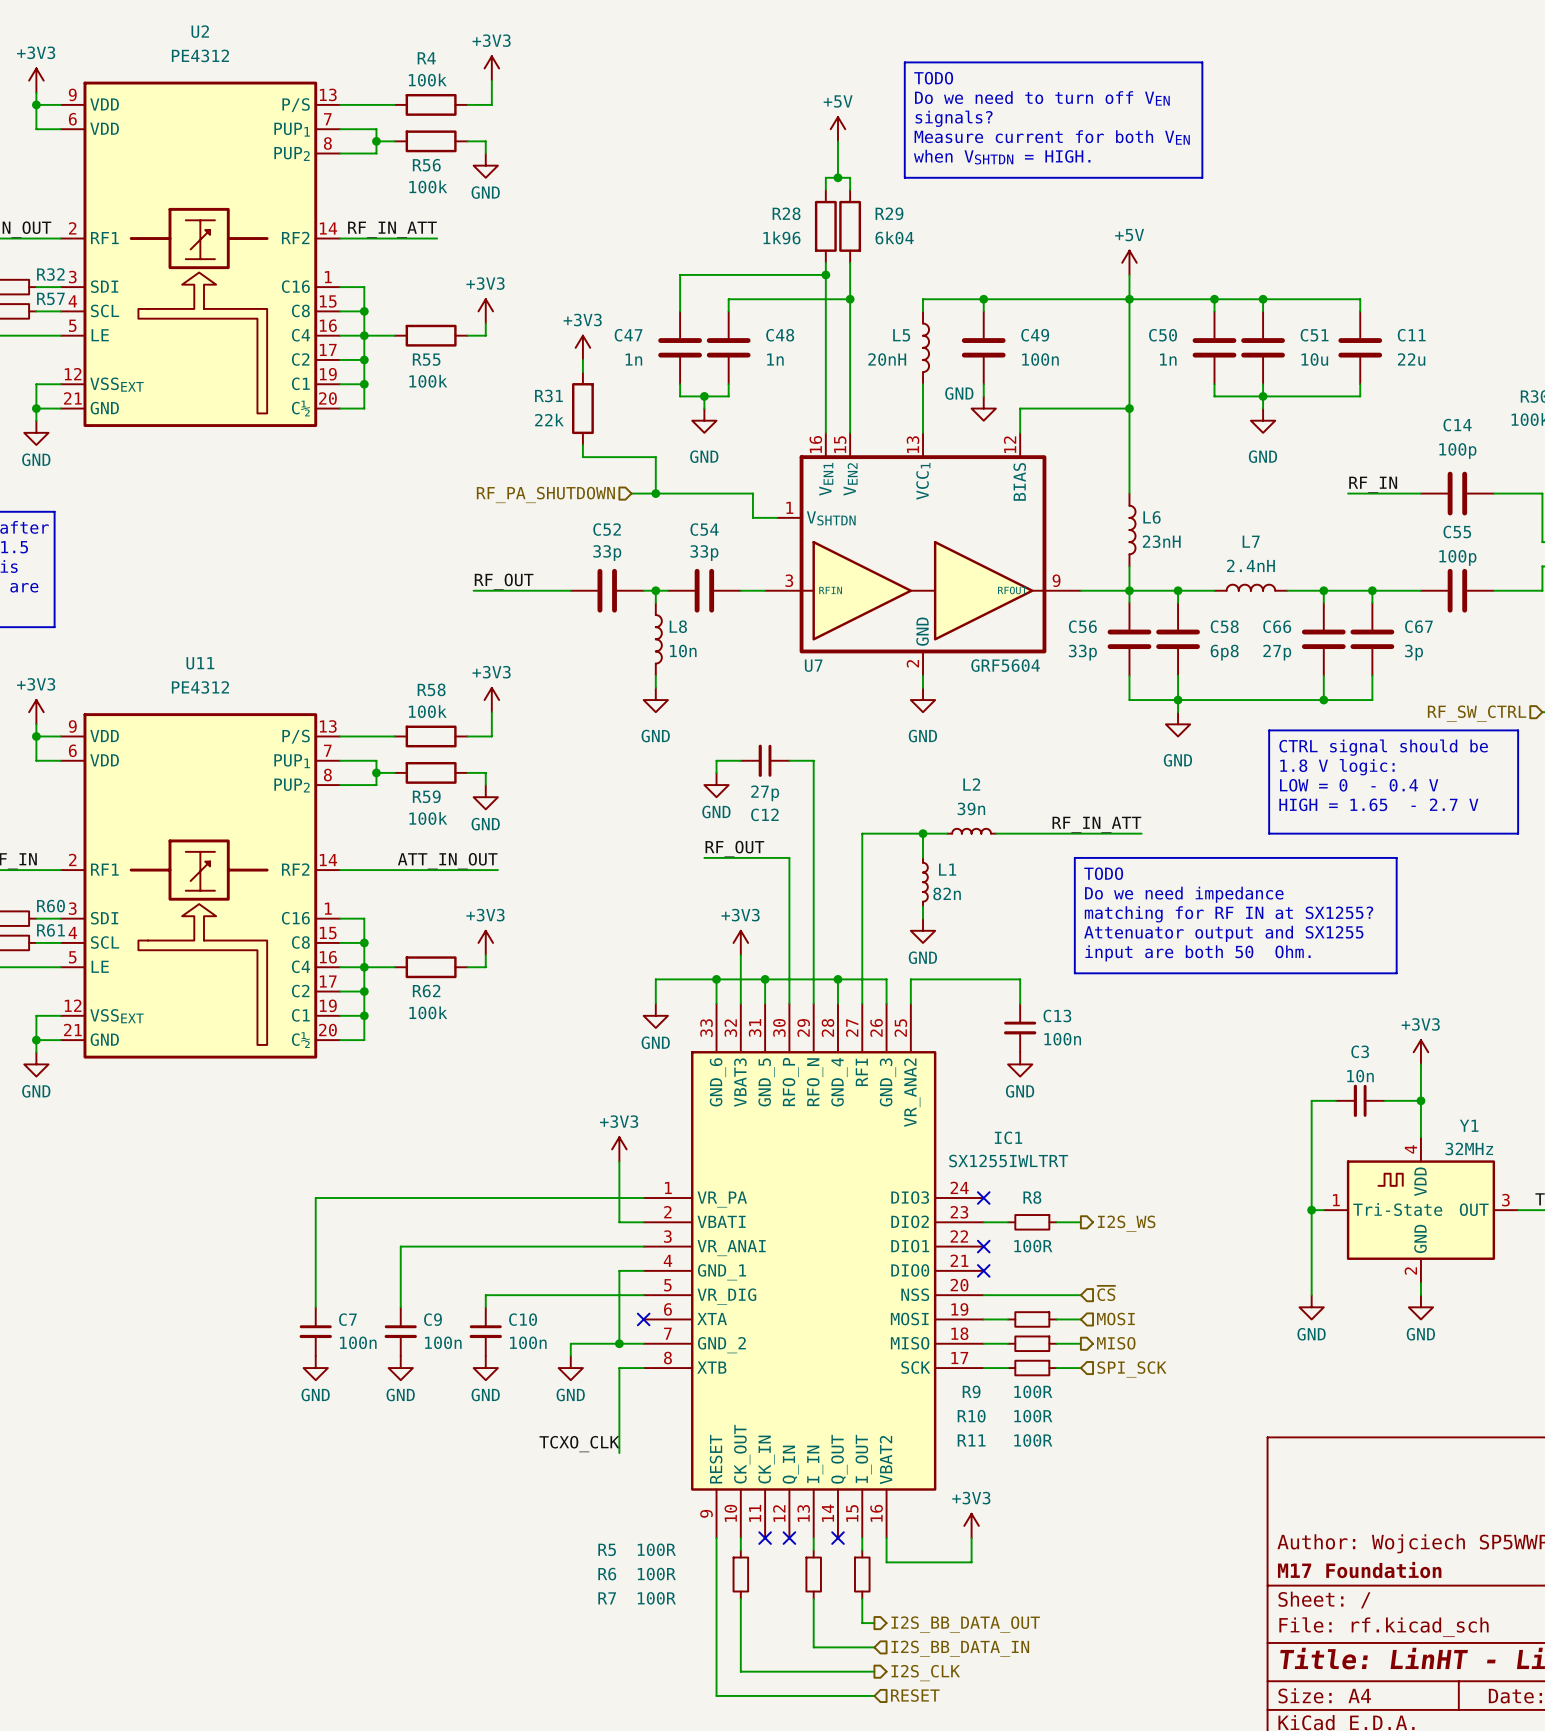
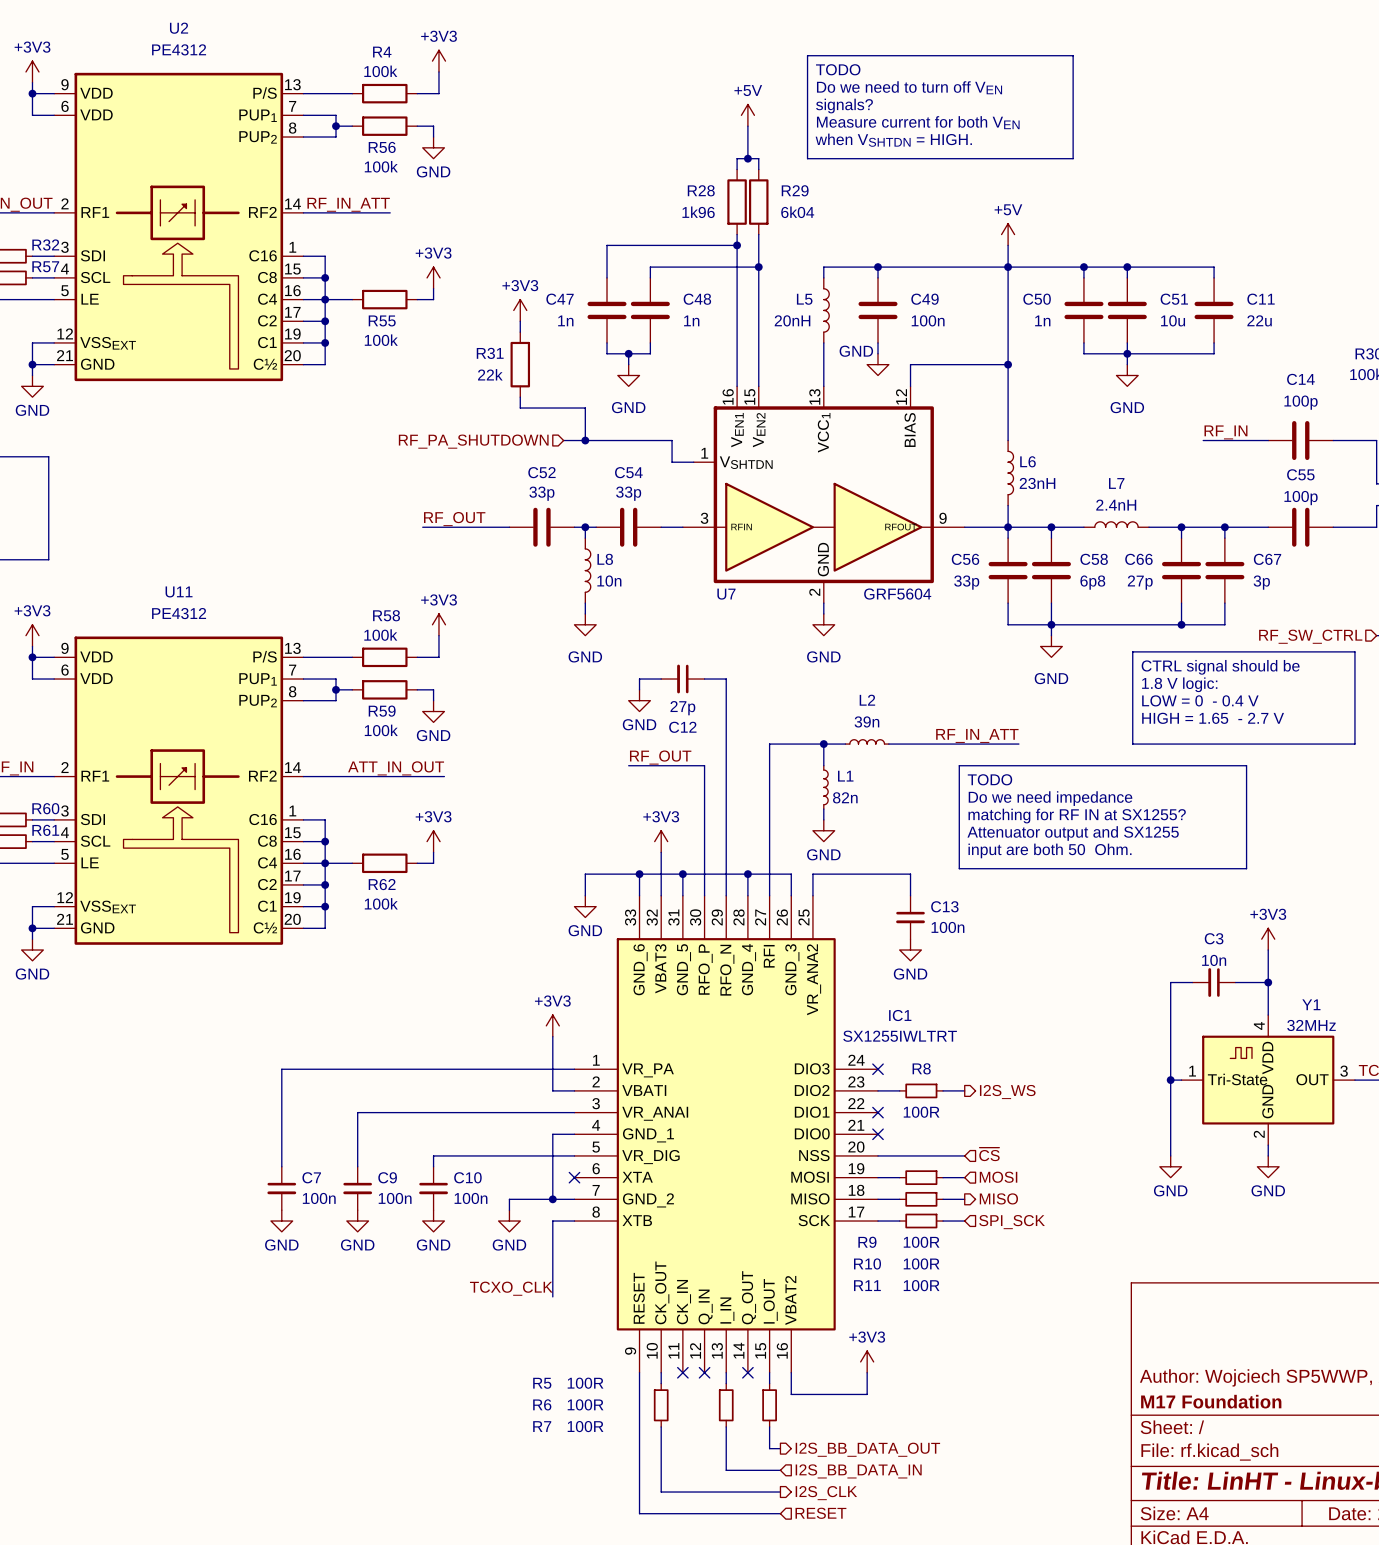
U2 symbol: [60, 81, 341, 428] -> [54, 72, 304, 382]
U11 symbol: [60, 713, 341, 1059] -> [54, 636, 304, 945]

